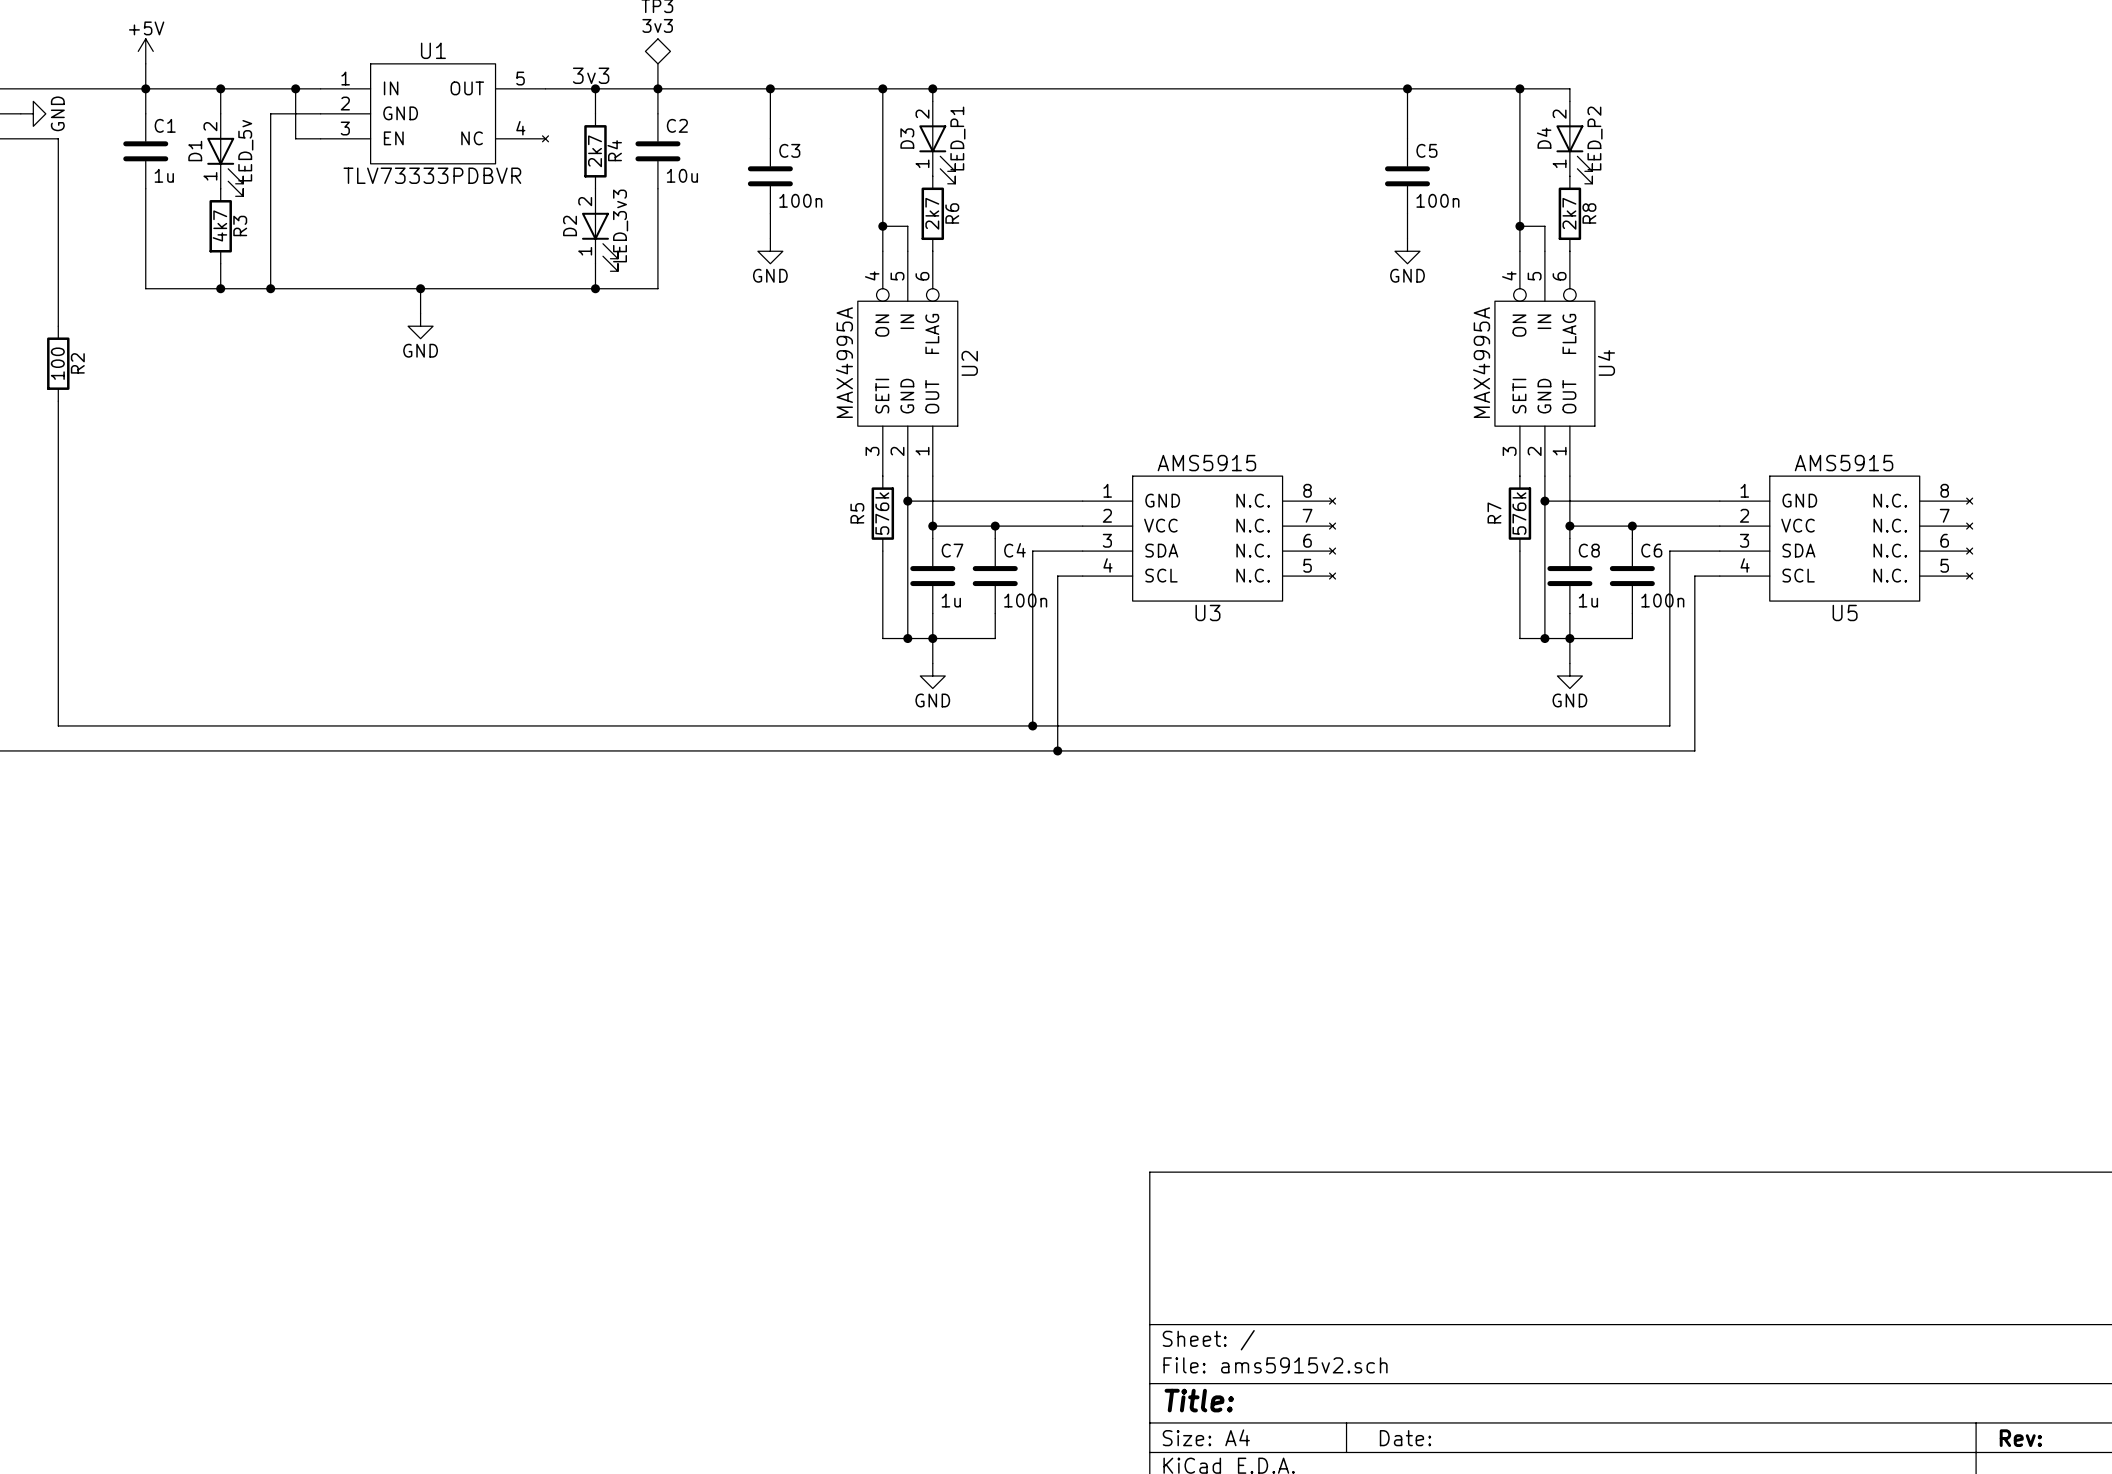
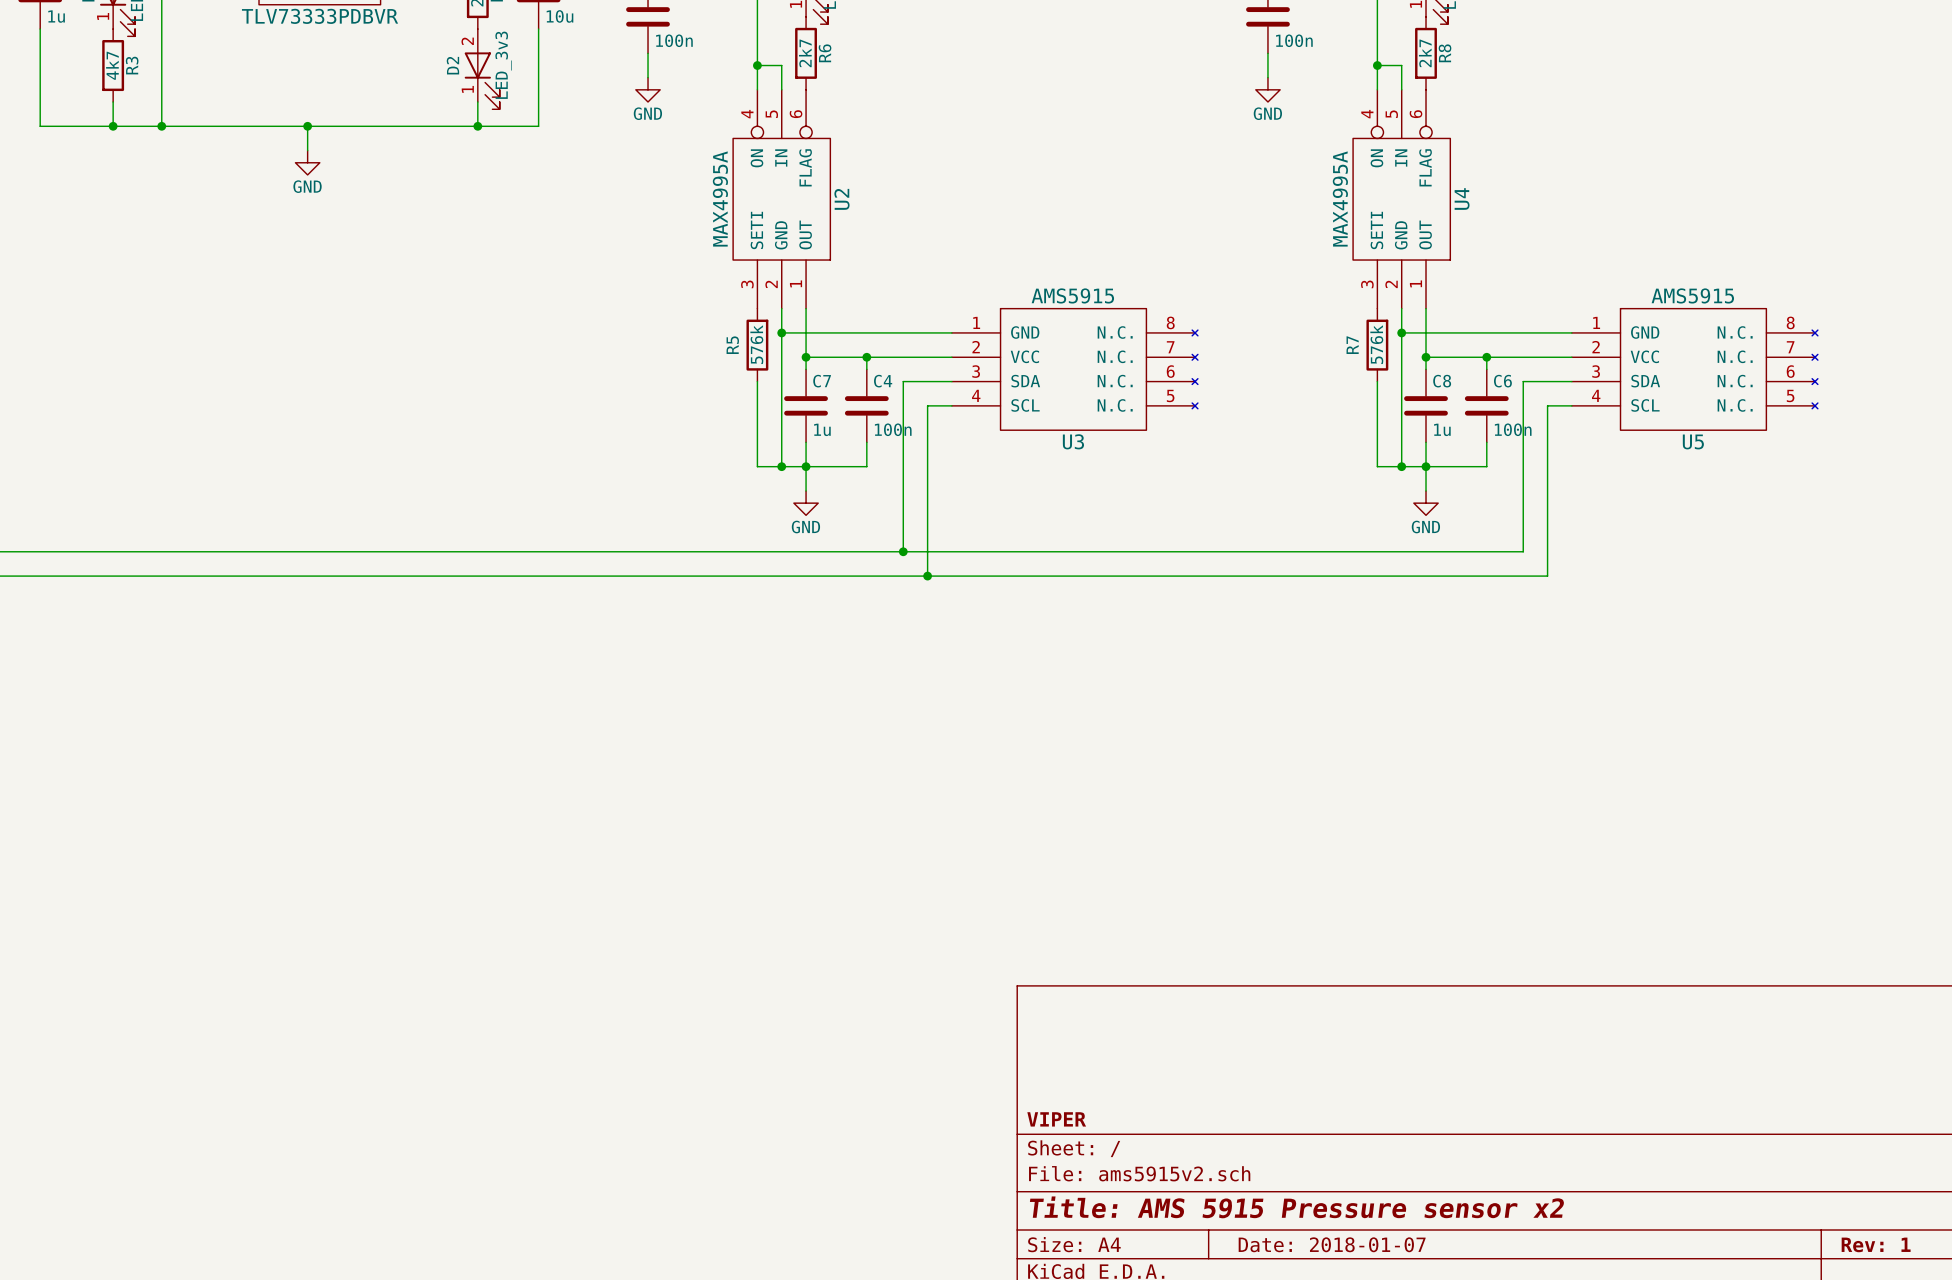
title block: none -> VIPER (1056, 1119)
title block: Title: (1199, 1400) -> Title: AMS 5915 Pressure sensor x2 (1297, 1207)
title block: Date: (1405, 1438) -> Date: 2018-01-07 (1332, 1244)
title block: Rev: (2020, 1438) -> Rev: 1 (1876, 1244)

